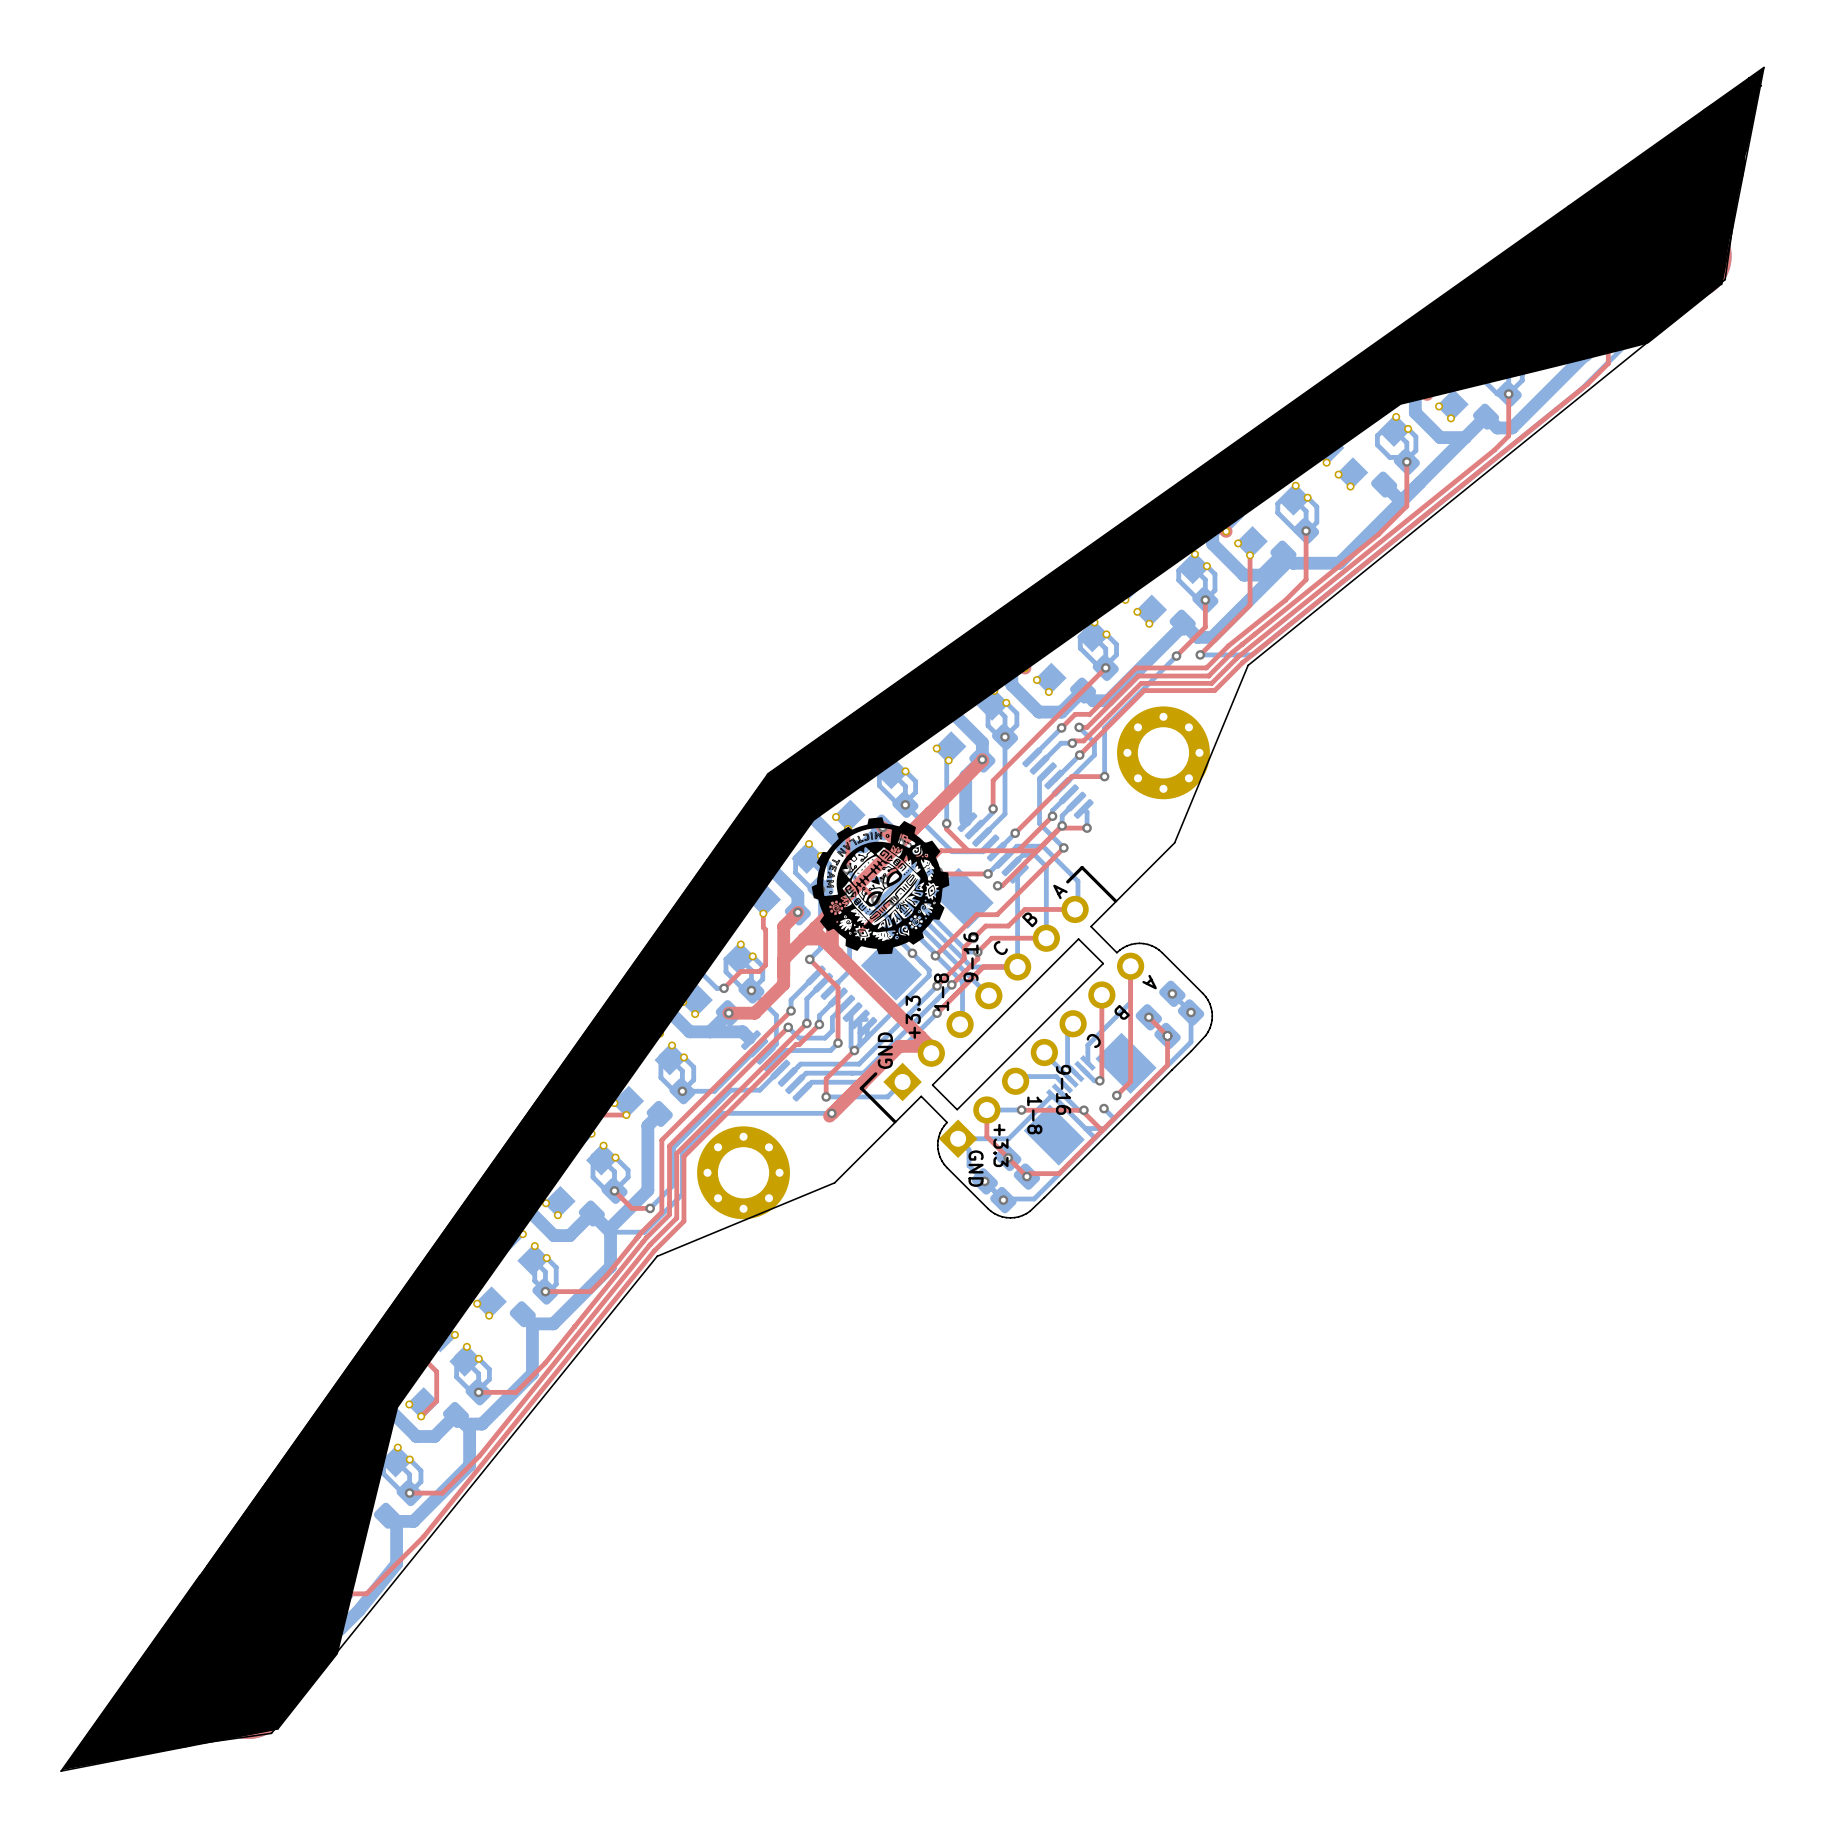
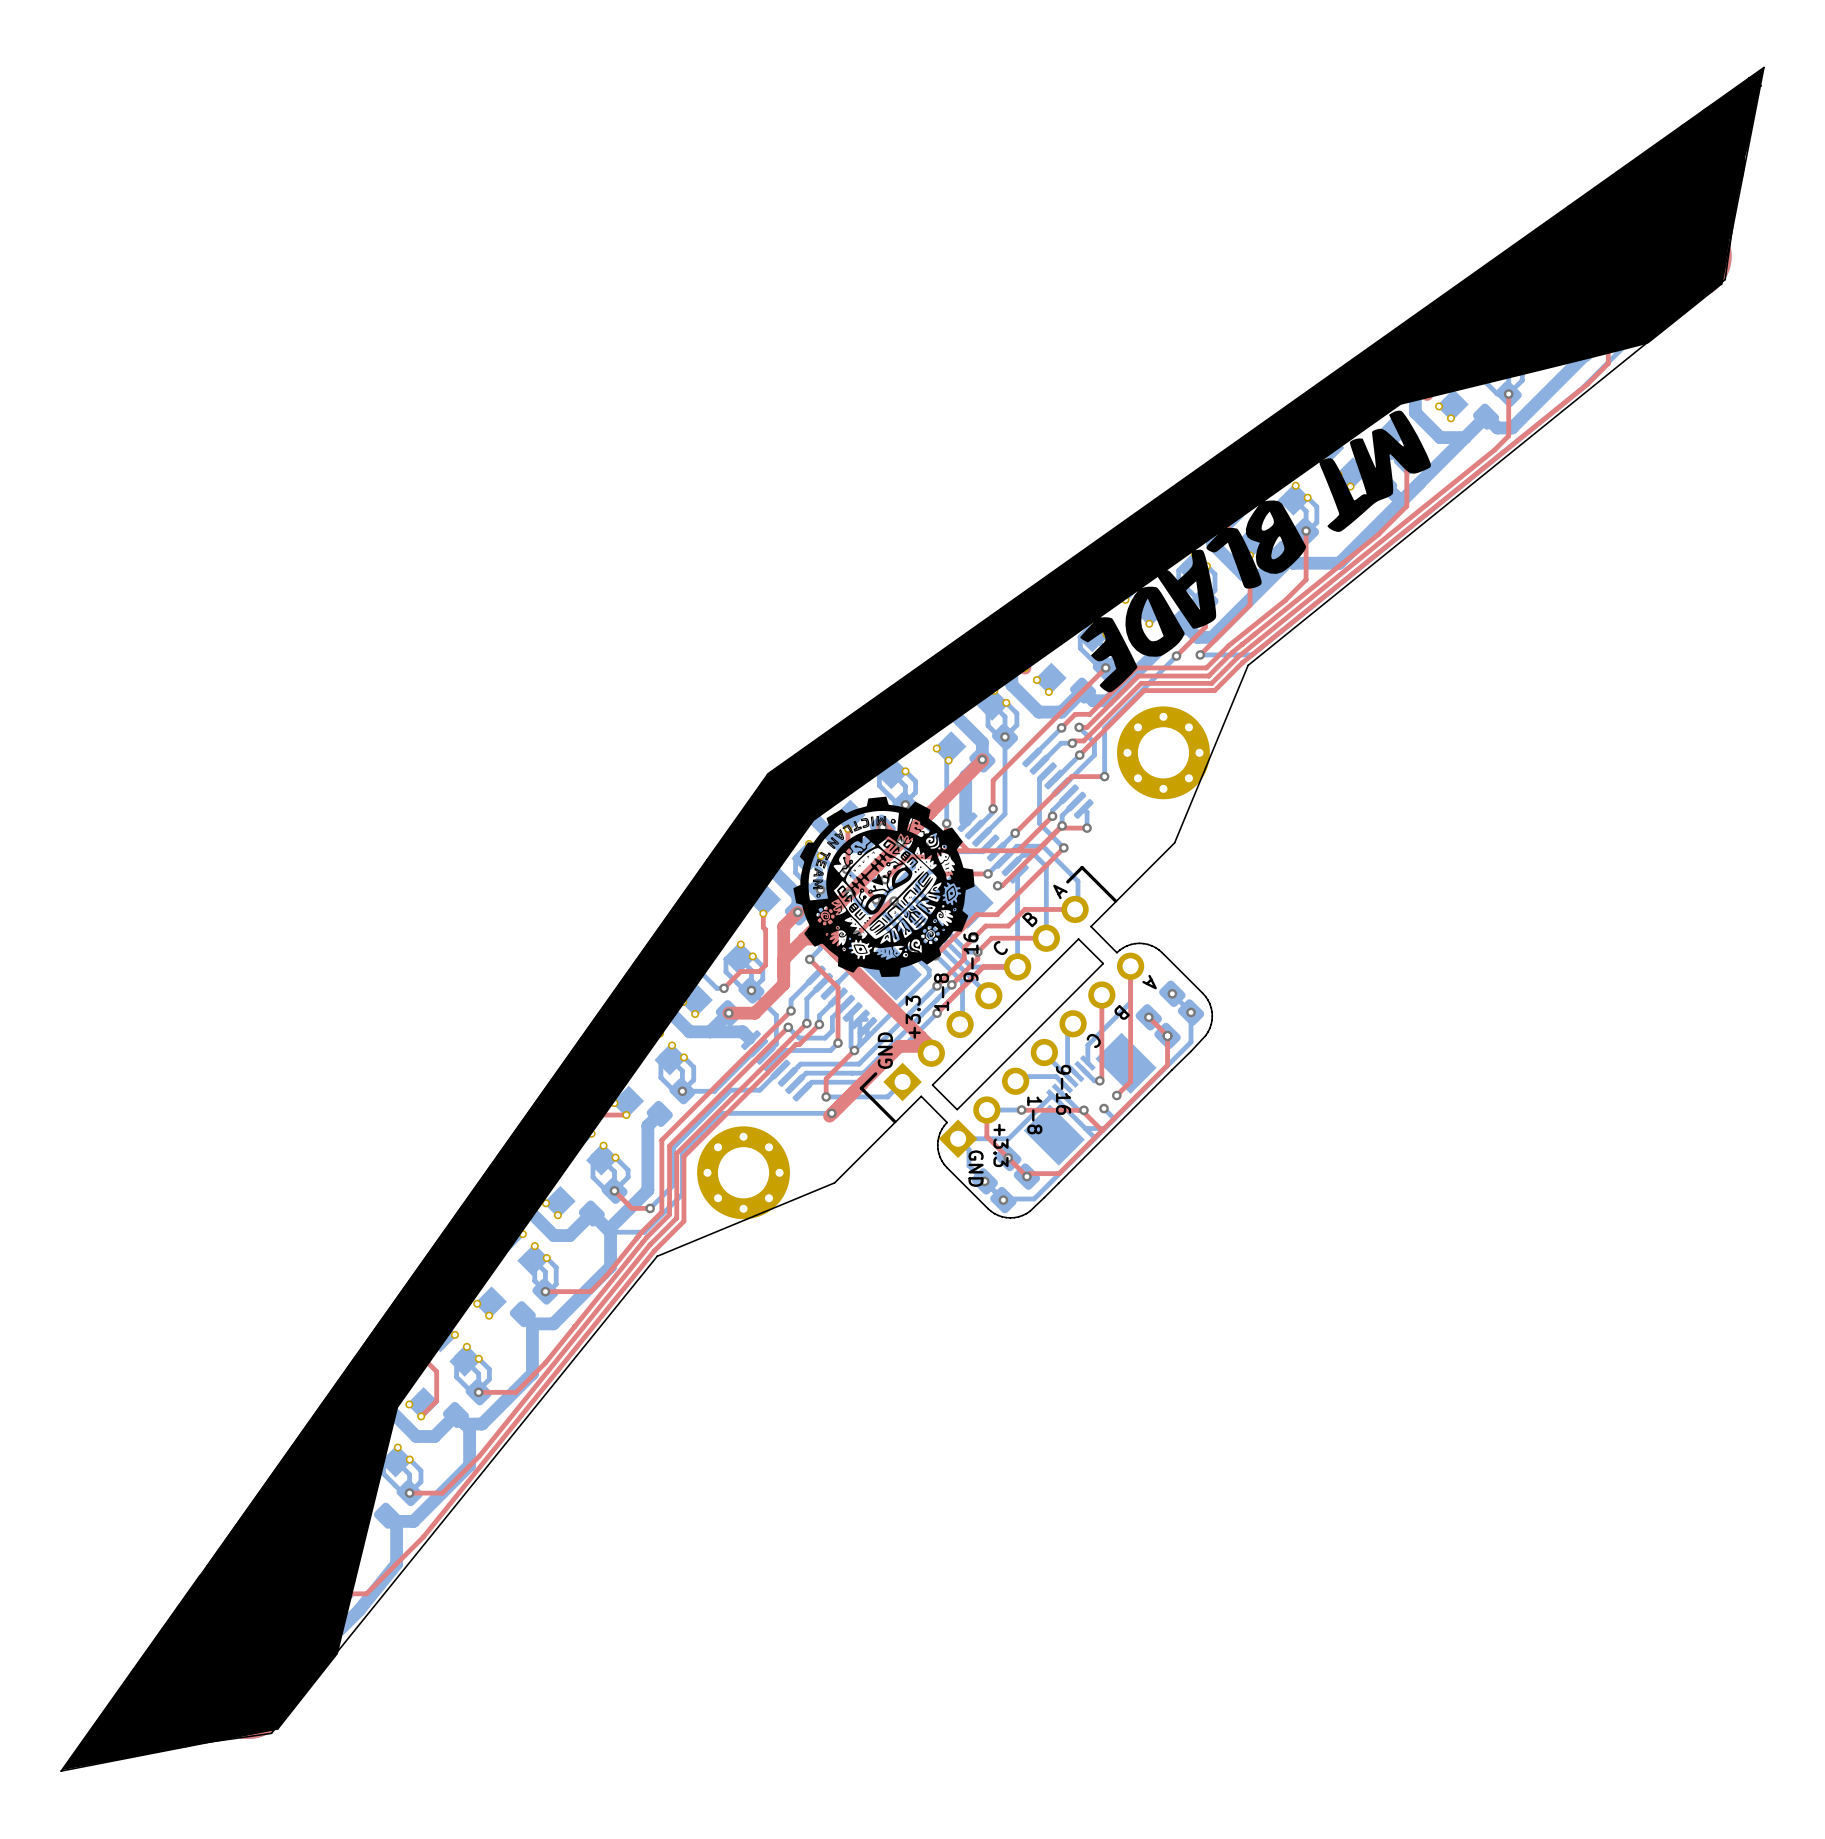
drawing: none -> [1080, 410, 1431, 693]
drawing shape: [811, 817, 950, 955] -> [793, 796, 975, 978]

